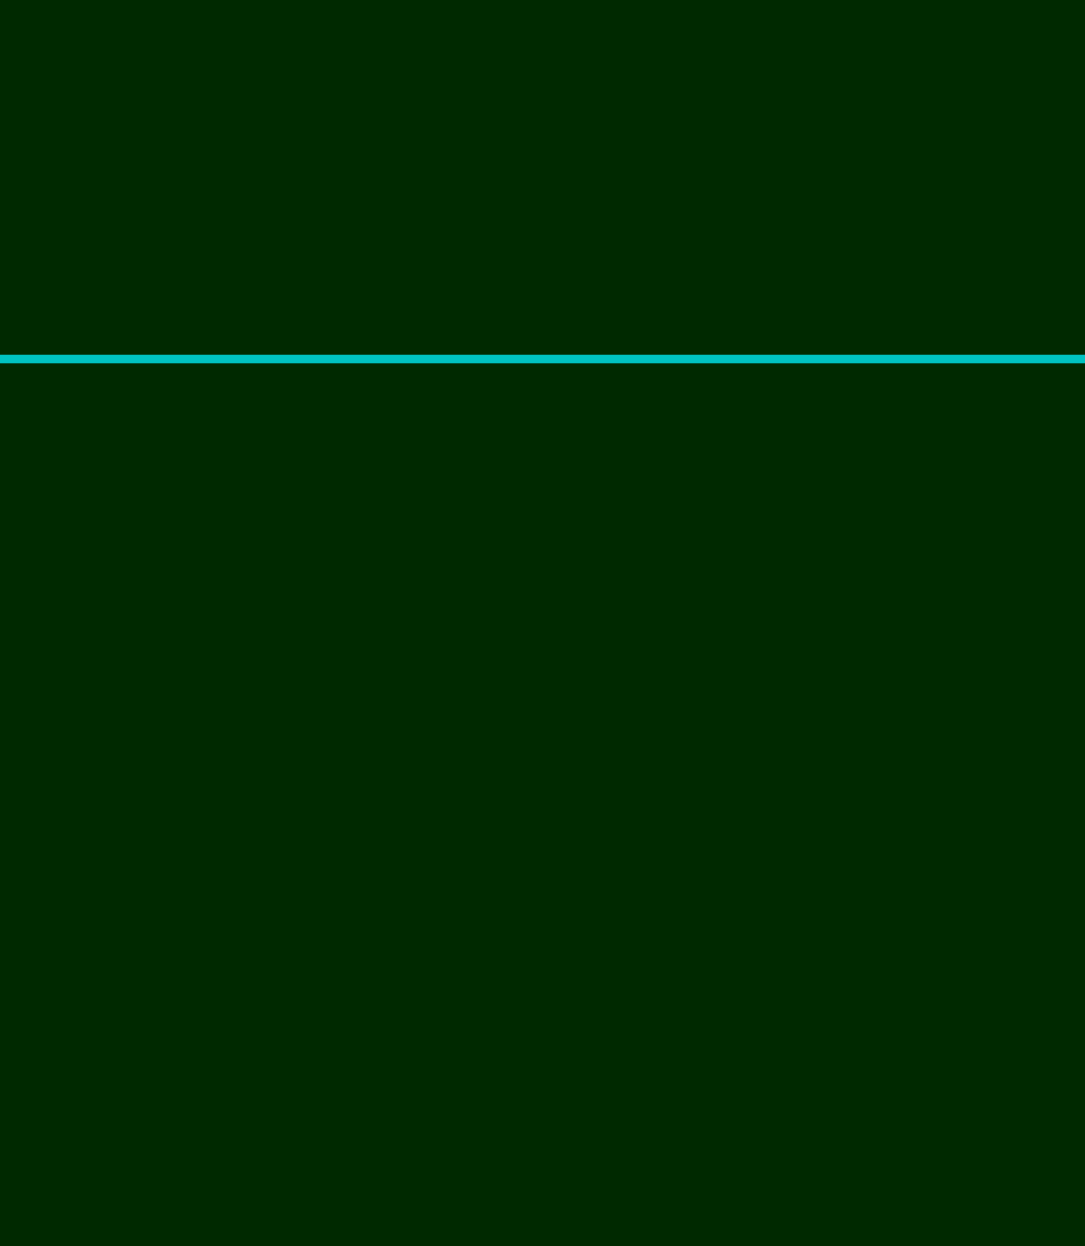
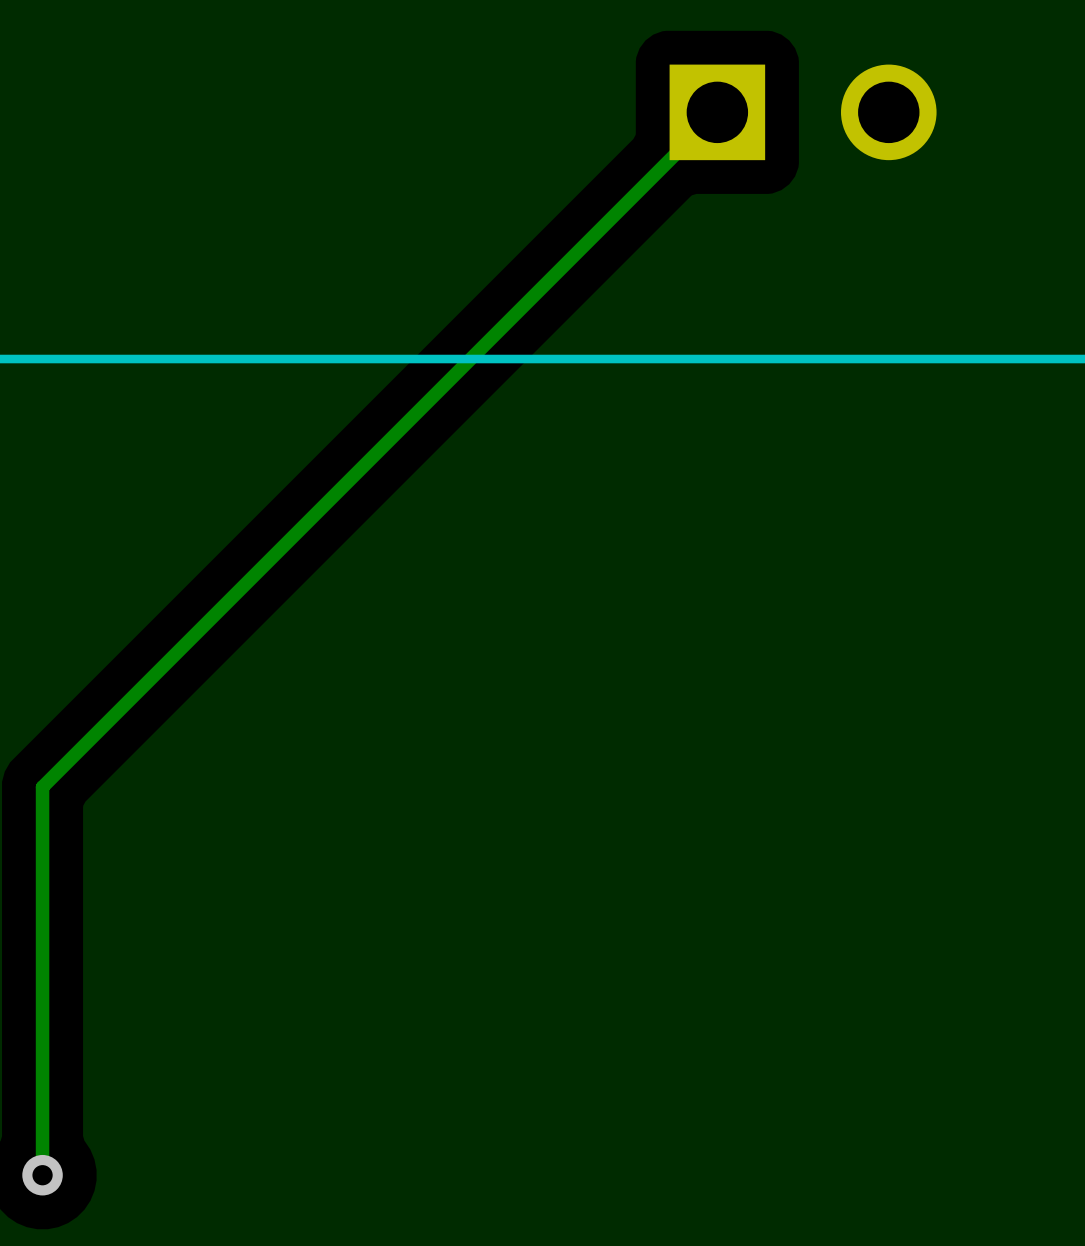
track: none -> (717, 112) (42, 787) (42, 1175)
part: none -> (803, 112)
via: none -> (42, 1175)

